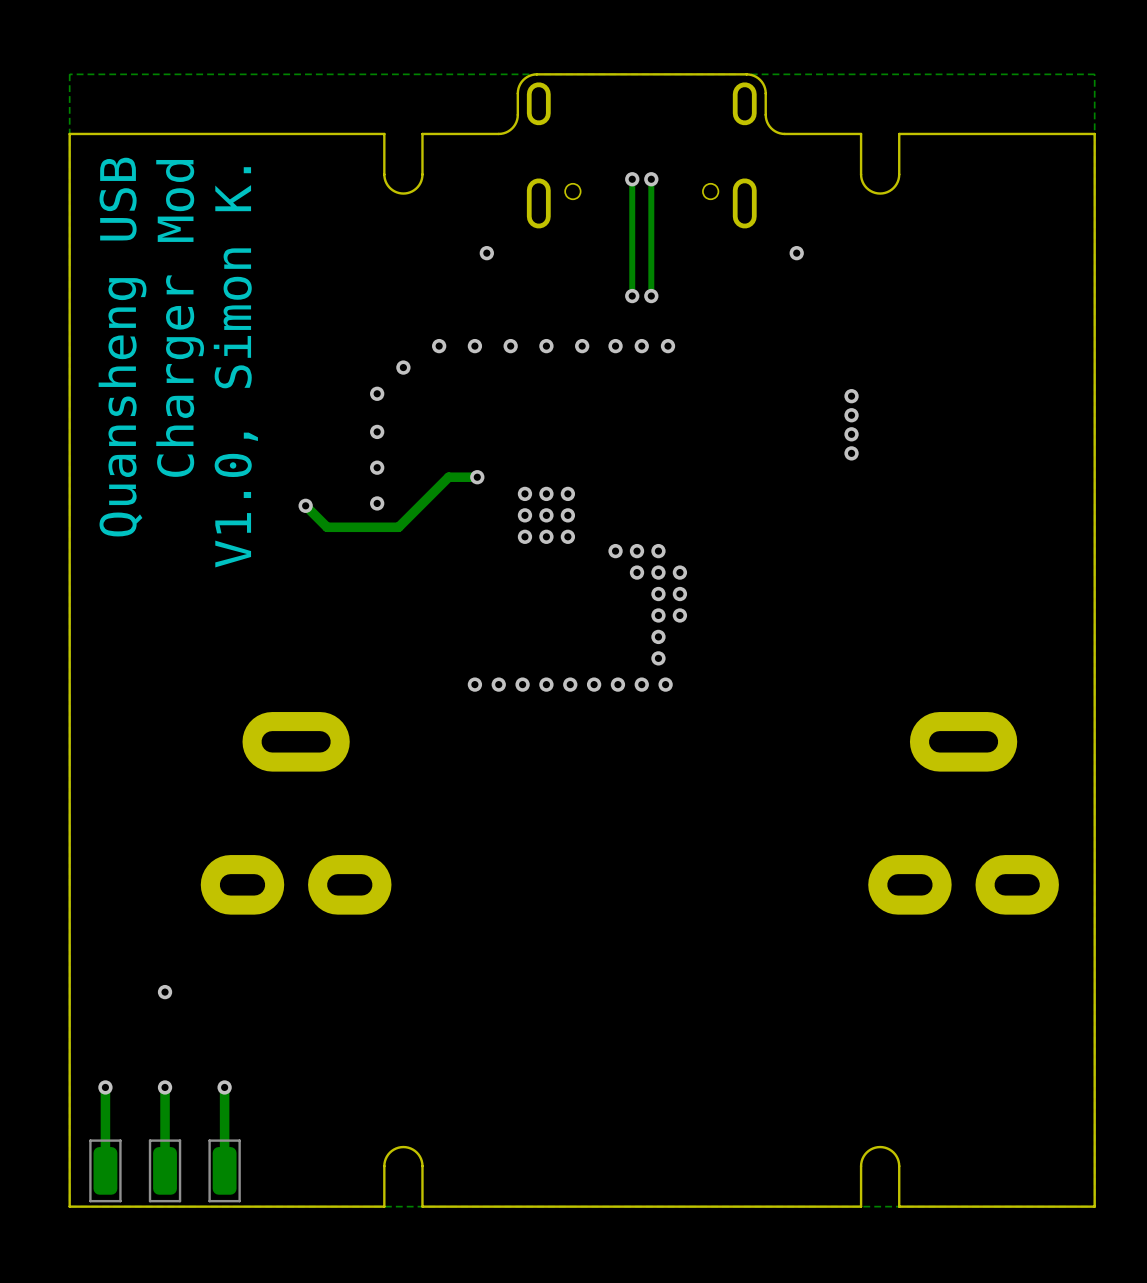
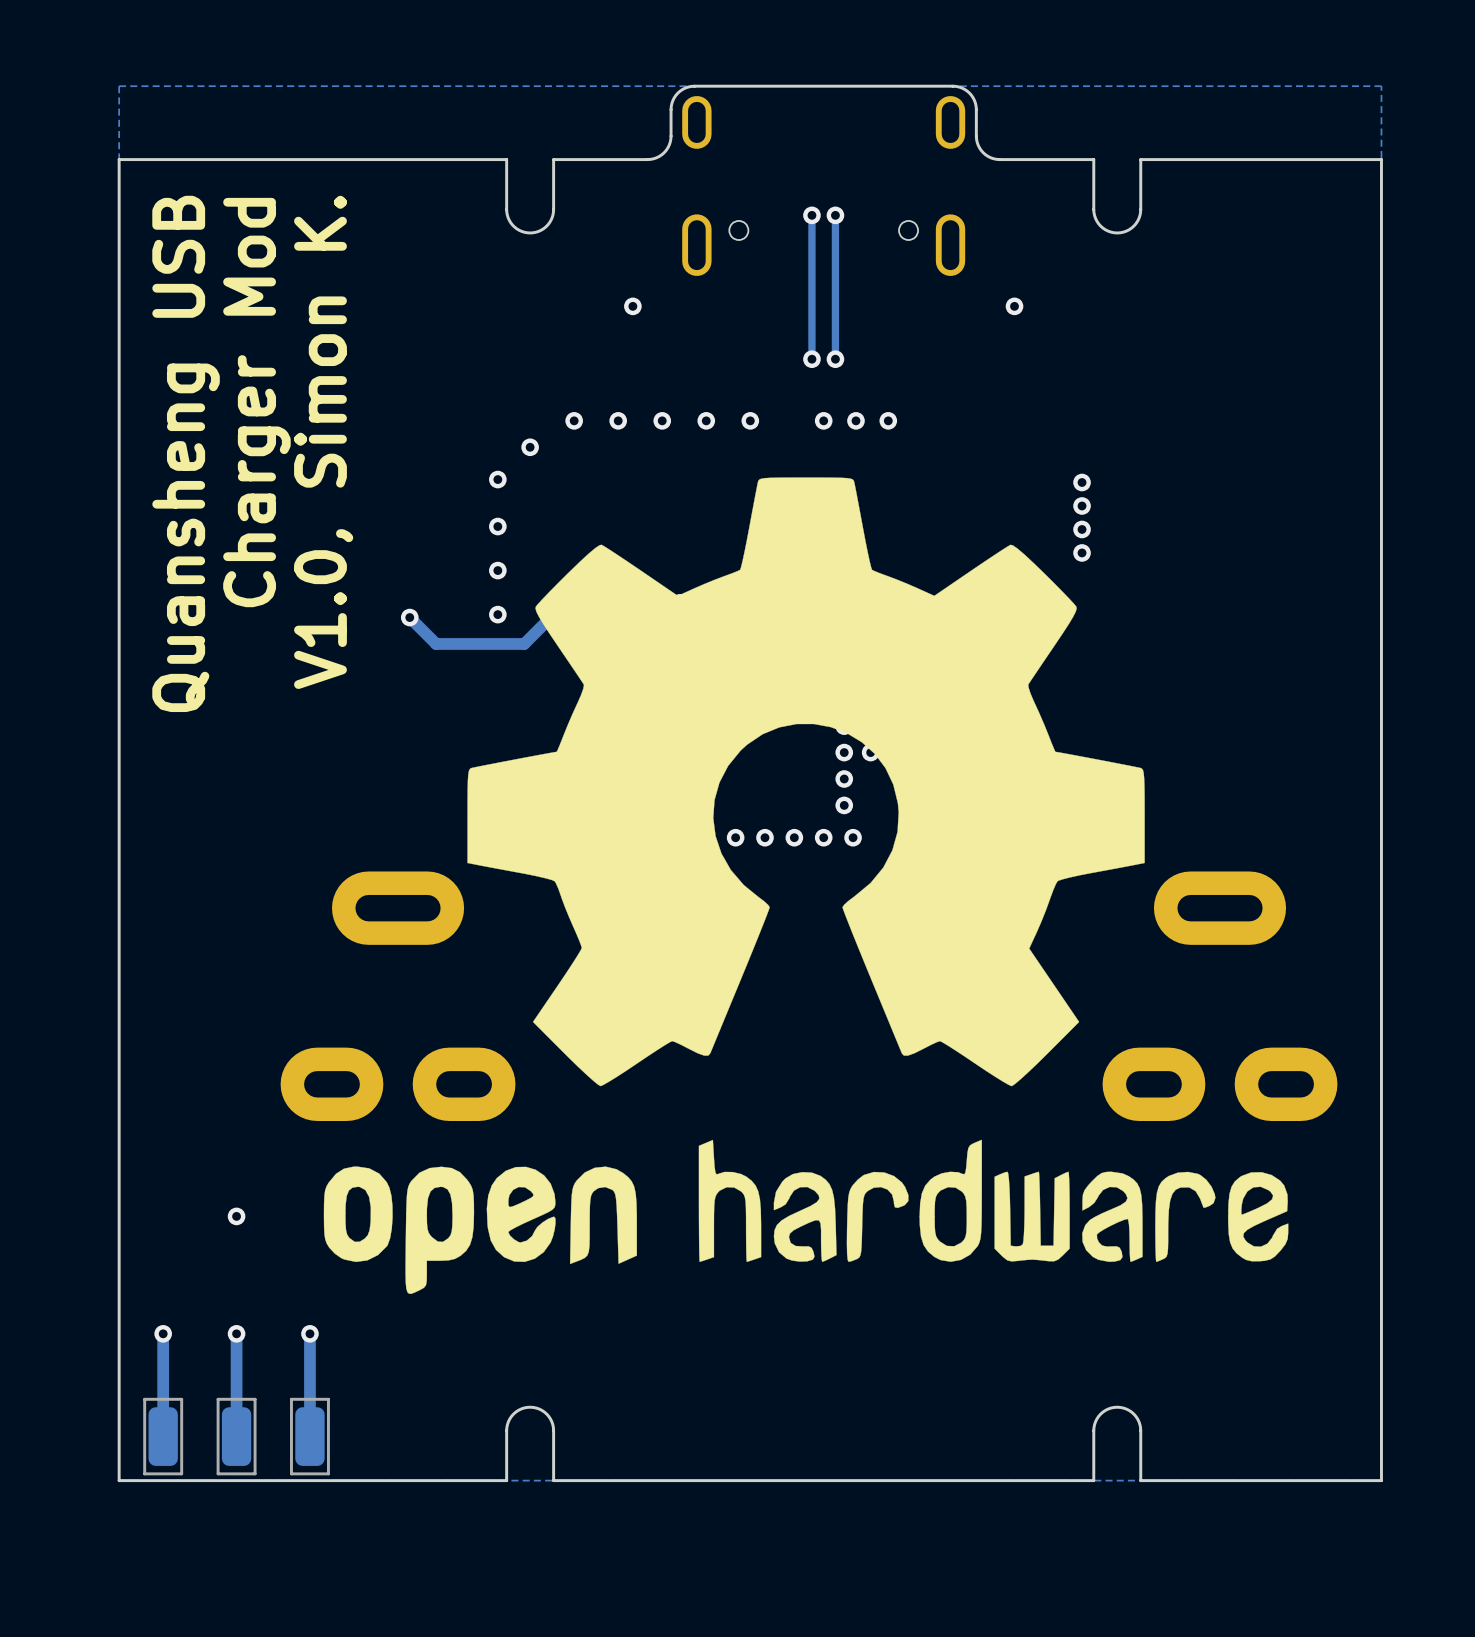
via position: (615, 346) -> (888, 420)
drawing: none -> [323, 477, 1289, 1294]

